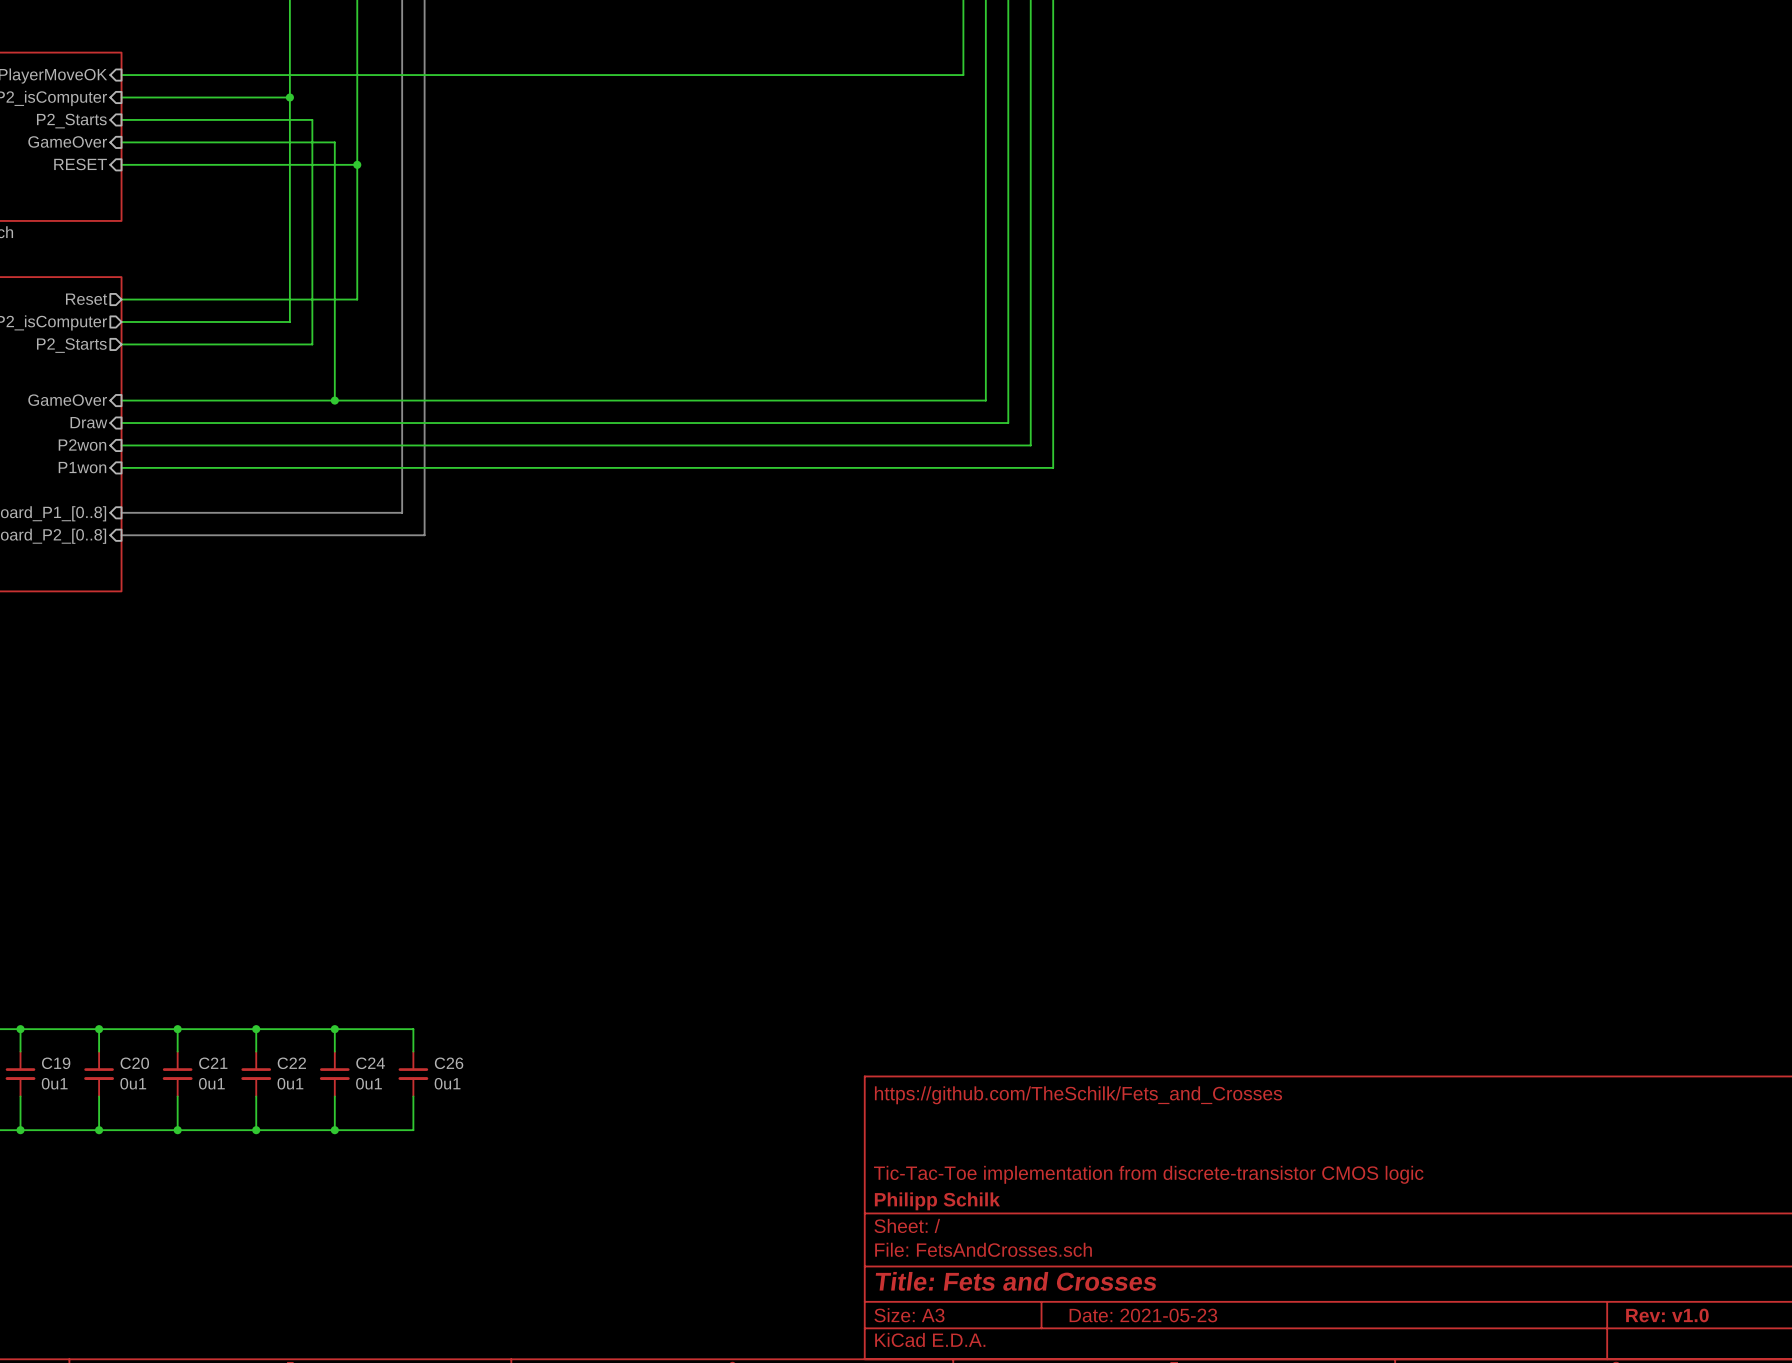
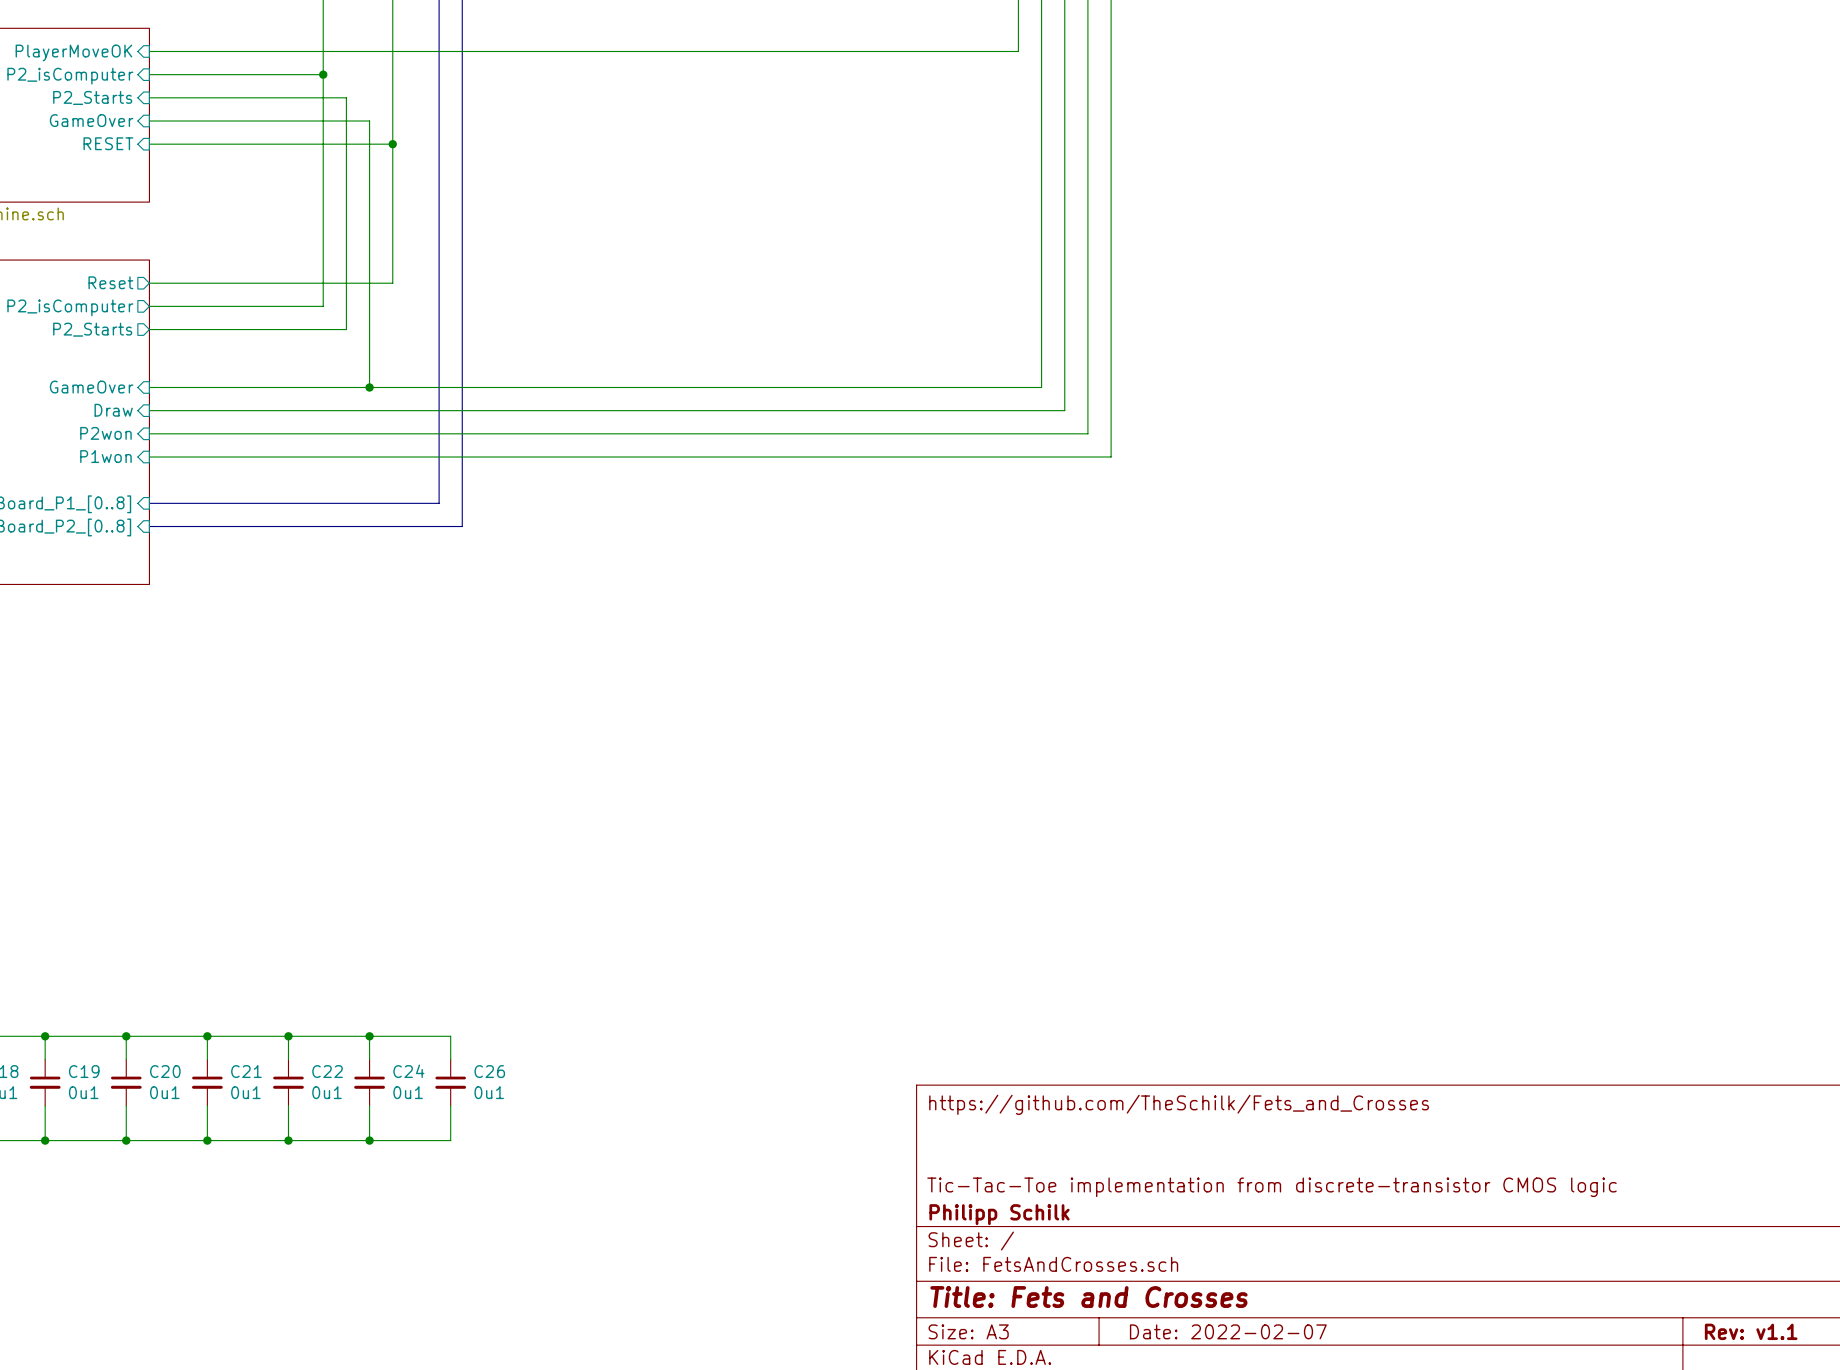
title block: Date: 2021-05-23 (1143, 1315) -> Date: 2022-02-07 (1228, 1331)
title block: Rev: v1.0 (1667, 1315) -> Rev: v1.1 (1751, 1331)

